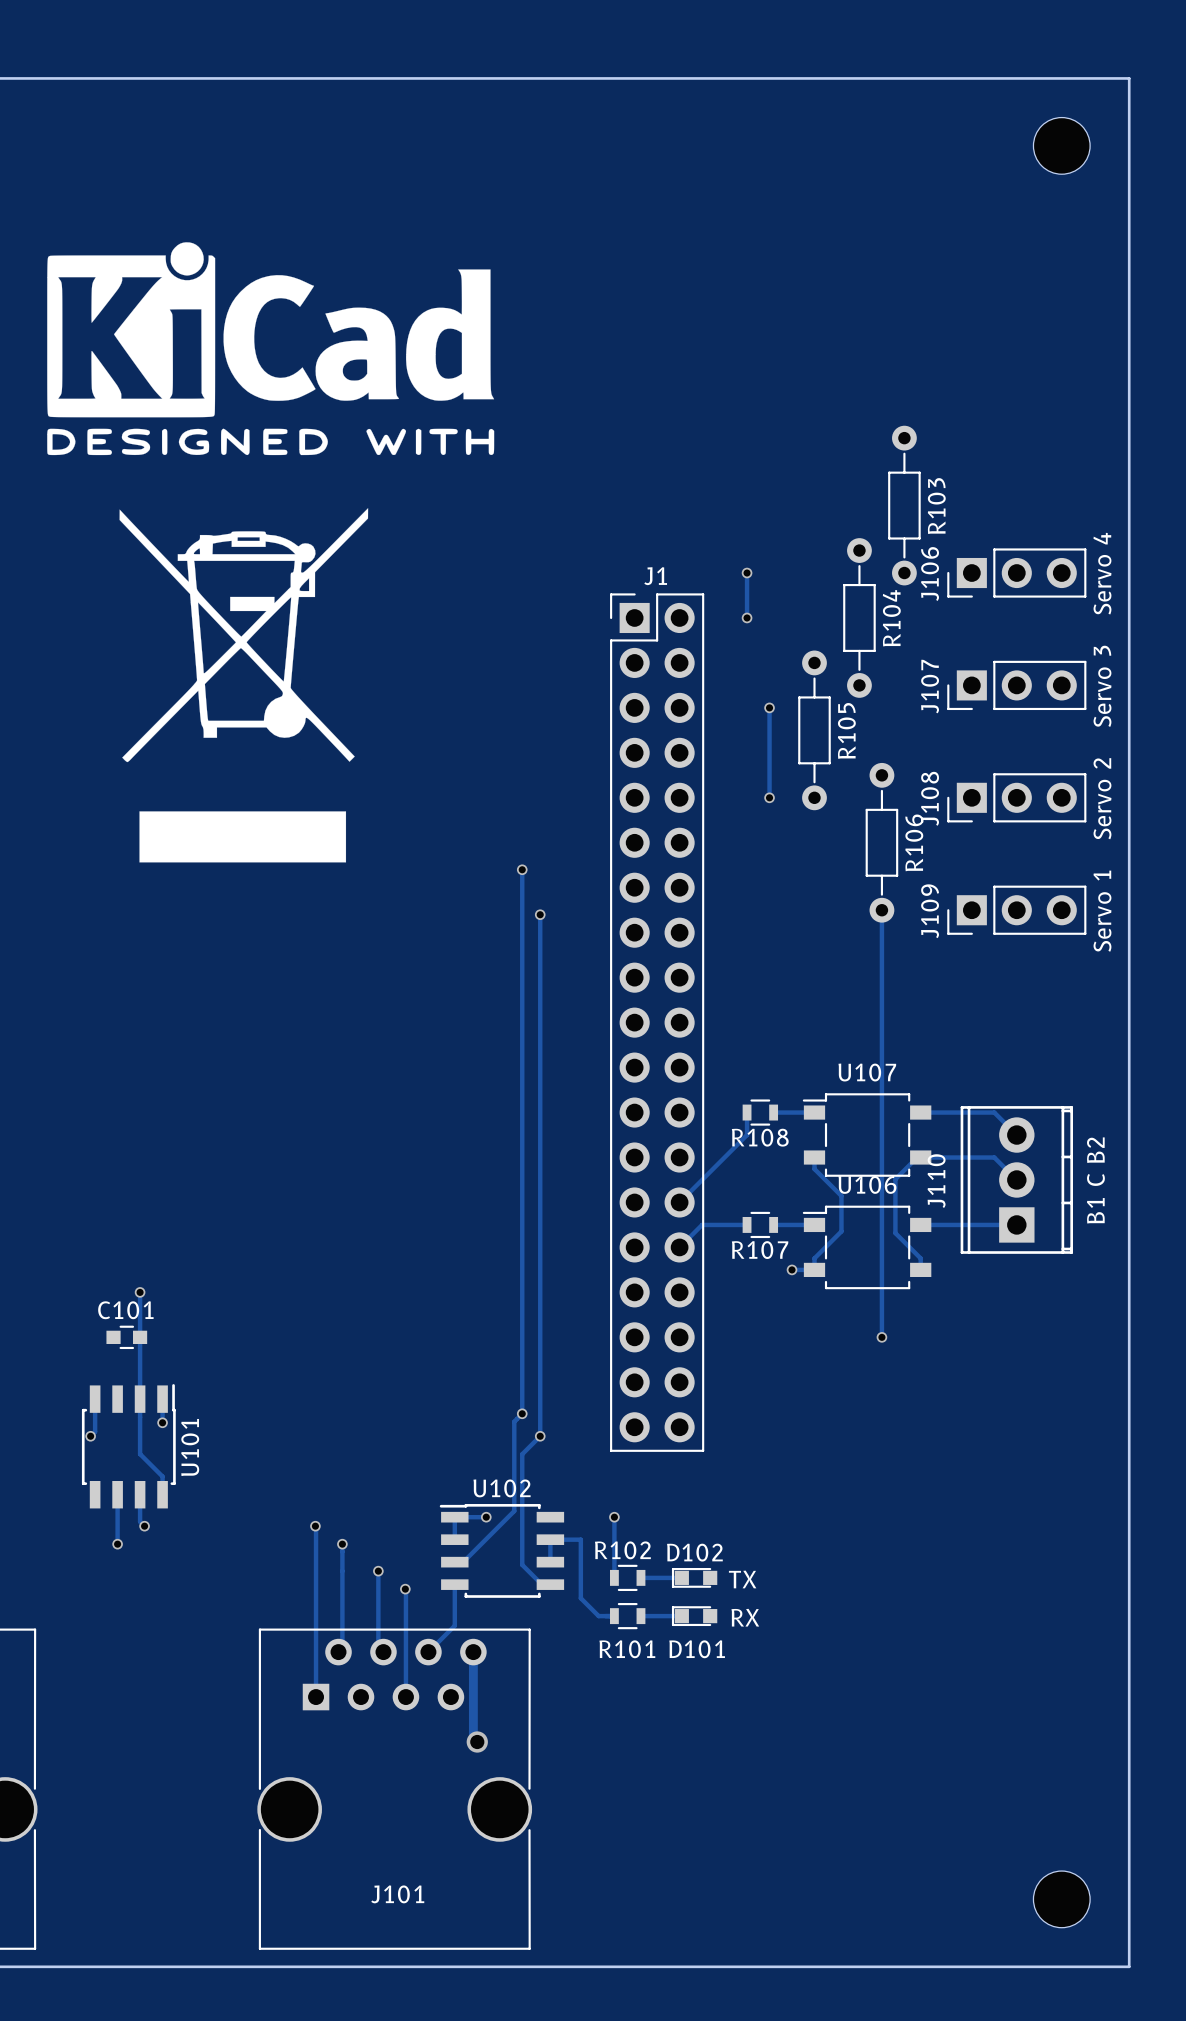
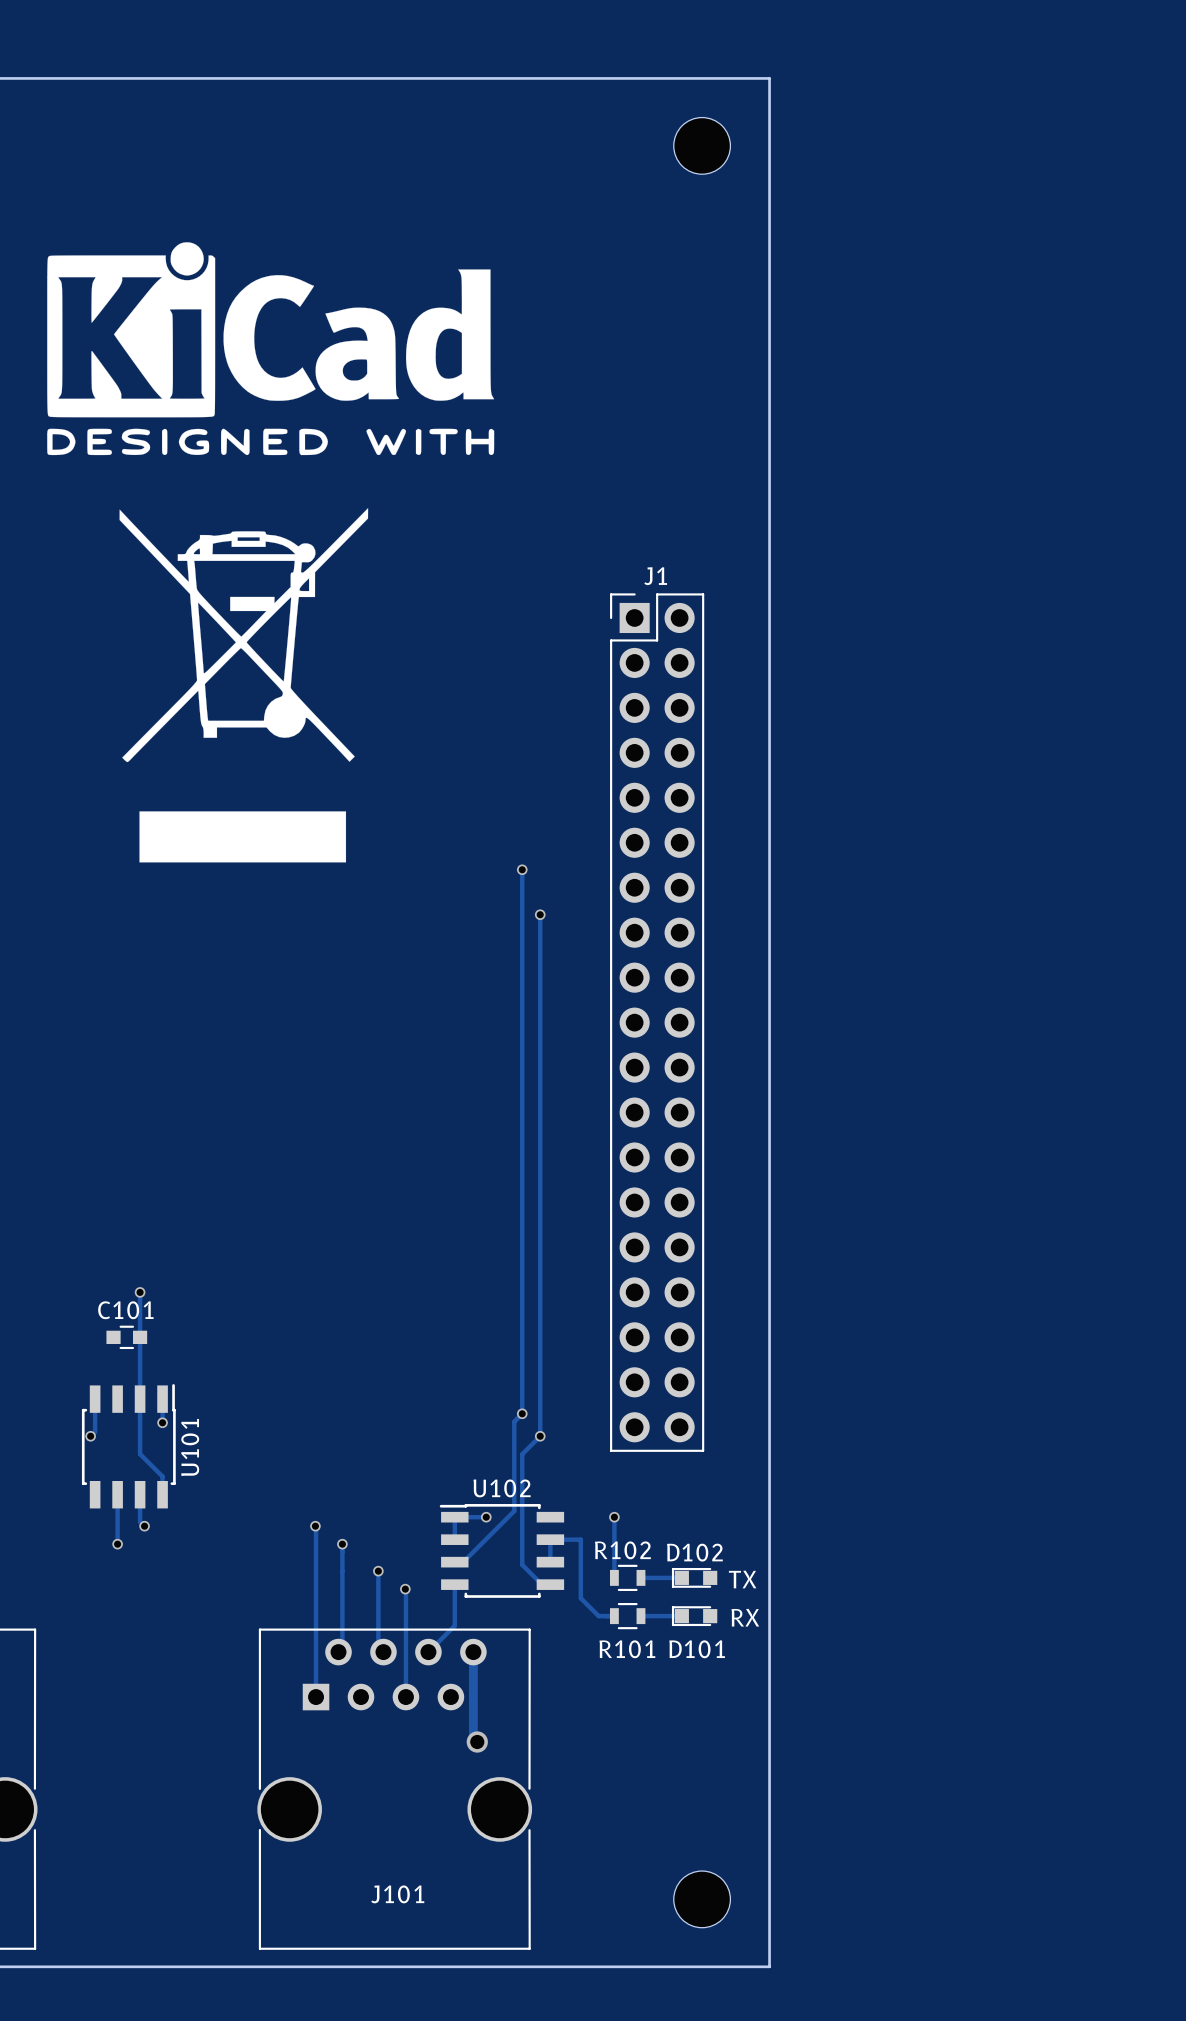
board edge: (769, 78) (1129, 78) (1129, 1966) (769, 1966) -> (769, 78) (769, 1966)
part position: (1061, 145) -> (702, 145)
R103: (904, 505) -> none
track: (747, 573) (747, 617) -> none
via: (747, 573) -> none
J106: Servo 4 (1016, 573) -> none
via: (747, 617) -> none
R104: (859, 617) -> none
J107: Servo 3 (1016, 685) -> none
track: (769, 707) (769, 797) -> none
via: (769, 707) -> none
R105: (814, 730) -> none
via: (769, 797) -> none
J108: Servo 2 (1016, 797) -> none
R106: (881, 842) -> none
track: (881, 910) (881, 1337) -> none
J109: Servo 1 (1016, 910) -> none
track: (747, 1112) (747, 1135) (679, 1202) -> none
R108: (760, 1112) -> none
track: (773, 1112) (814, 1112) -> none
track: (920, 1112) (994, 1112) (1016, 1135) -> none
U107: (867, 1135) -> none
track: (814, 1157) (814, 1169) (841, 1195) (841, 1231) (814, 1258) (814, 1269) (792, 1269) -> none
track: (1016, 1179) (994, 1157) (917, 1157) (895, 1179) (895, 1233) (920, 1258) (920, 1269) -> none
J110: B1 C B2 (1016, 1179) -> none
track: (747, 1224) (702, 1224) (679, 1247) -> none
R107: (760, 1224) -> none
track: (773, 1224) (814, 1224) -> none
track: (920, 1224) (1016, 1224) -> none
U106: (867, 1247) -> none
via: (792, 1269) -> none
via: (881, 1337) -> none
part position: (1061, 1899) -> (702, 1899)

